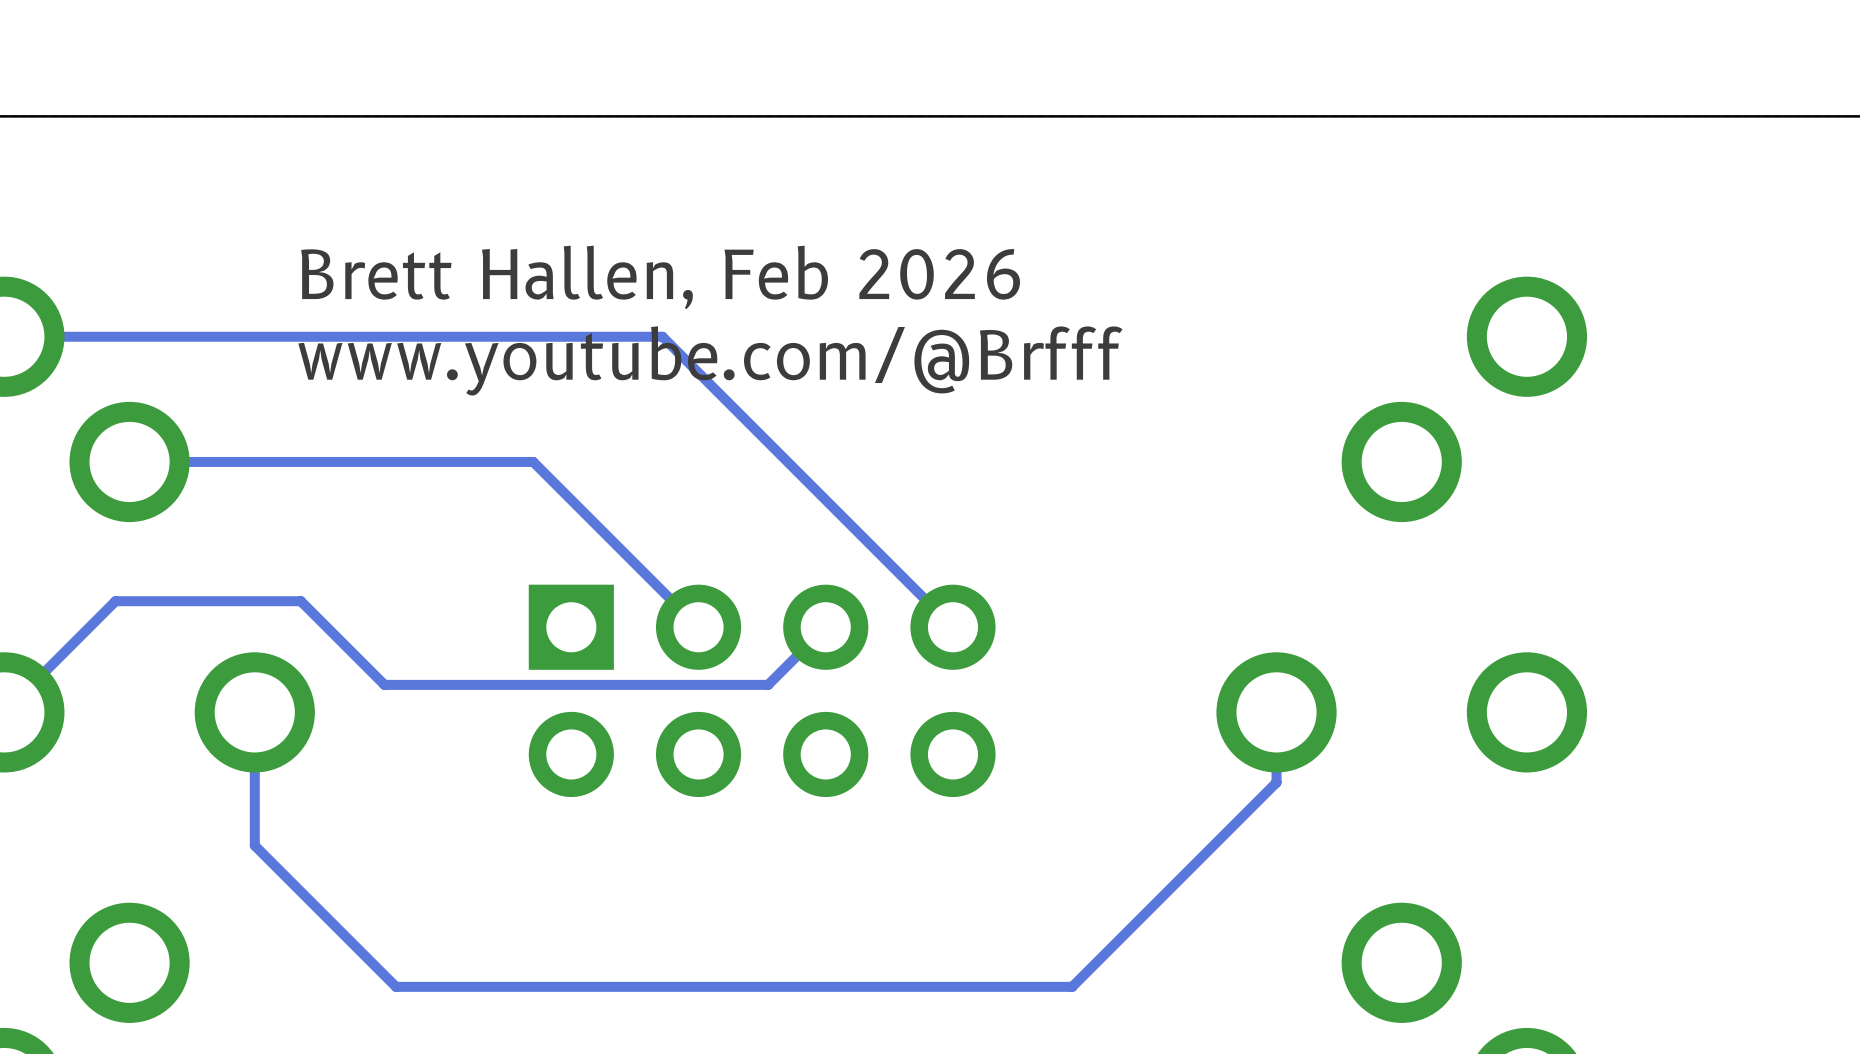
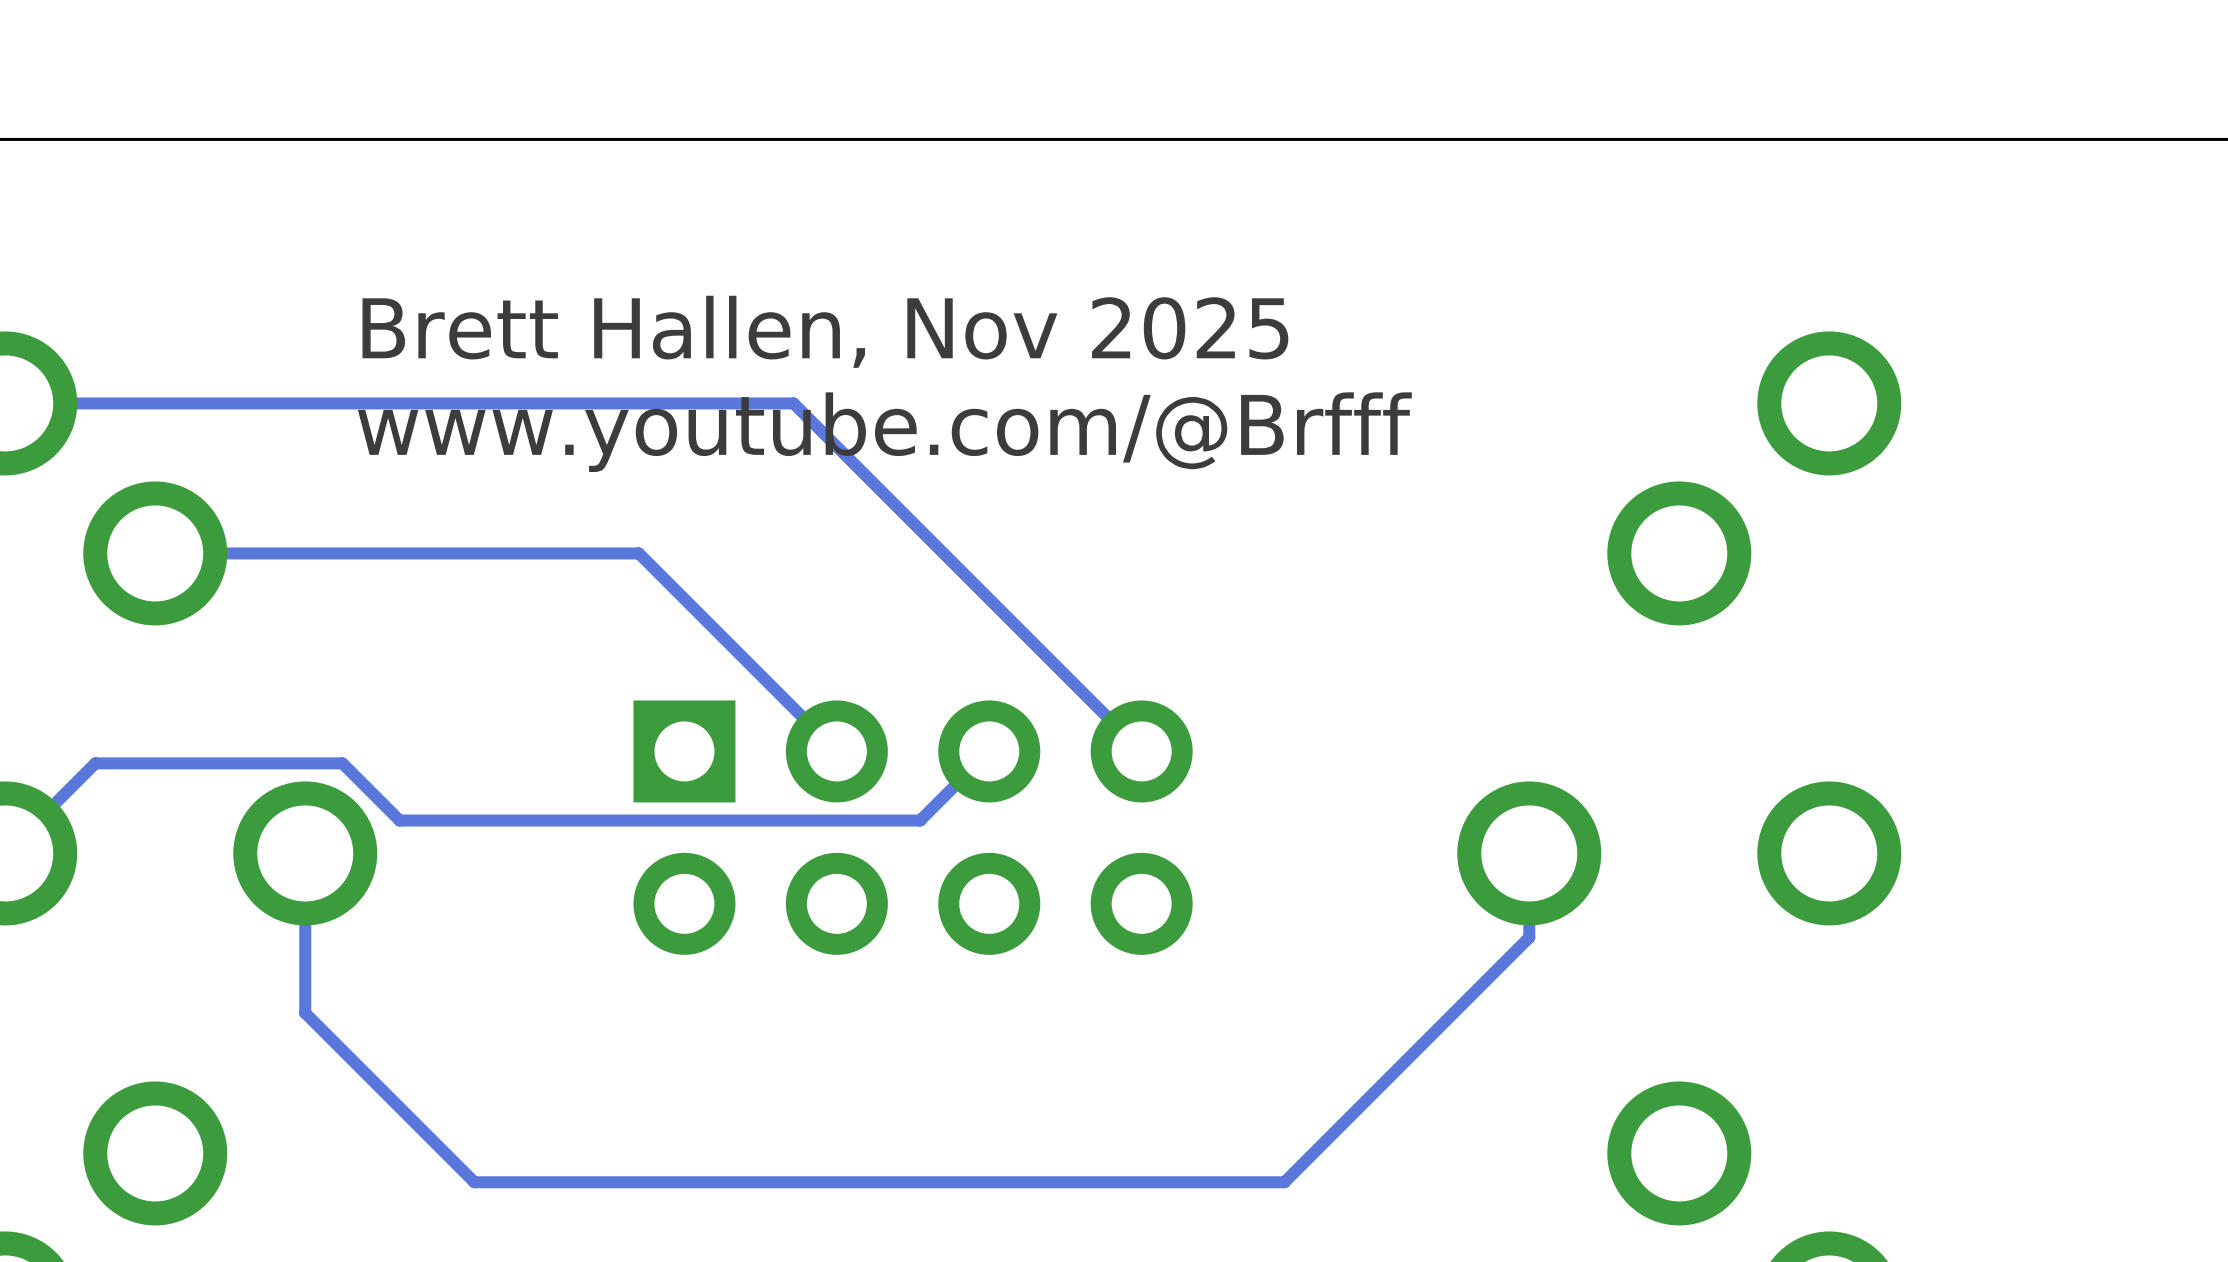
text: Brett Hallen, Feb 2026 (660, 277) -> Brett Hallen, Nov 2025 (825, 331)
track: (79, 637) (115, 601) (300, 601) (384, 684) -> (95, 763) (342, 763) (399, 820) (460, 820)

